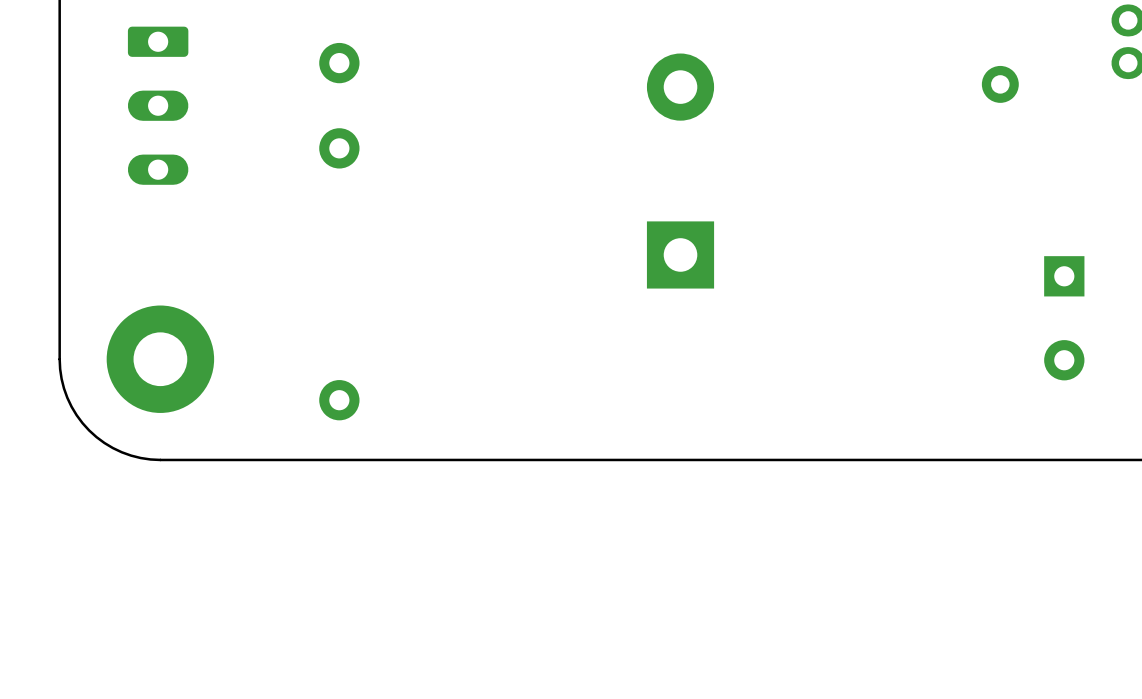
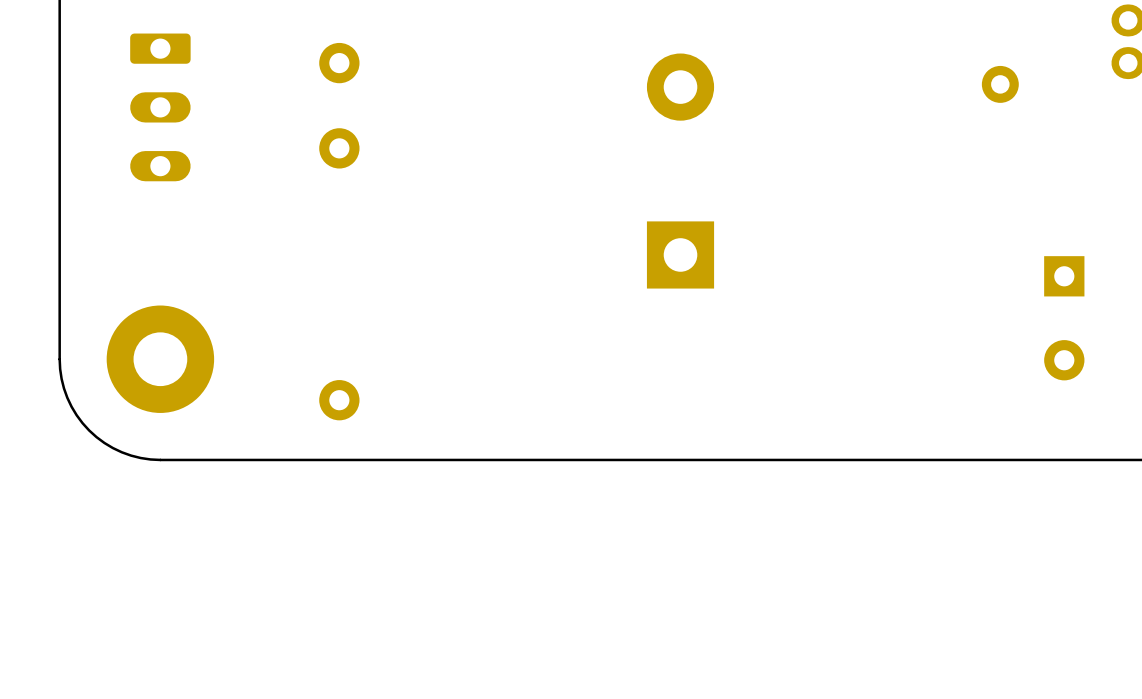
part footprint: [127, 26, 189, 185] -> [130, 33, 191, 182]

